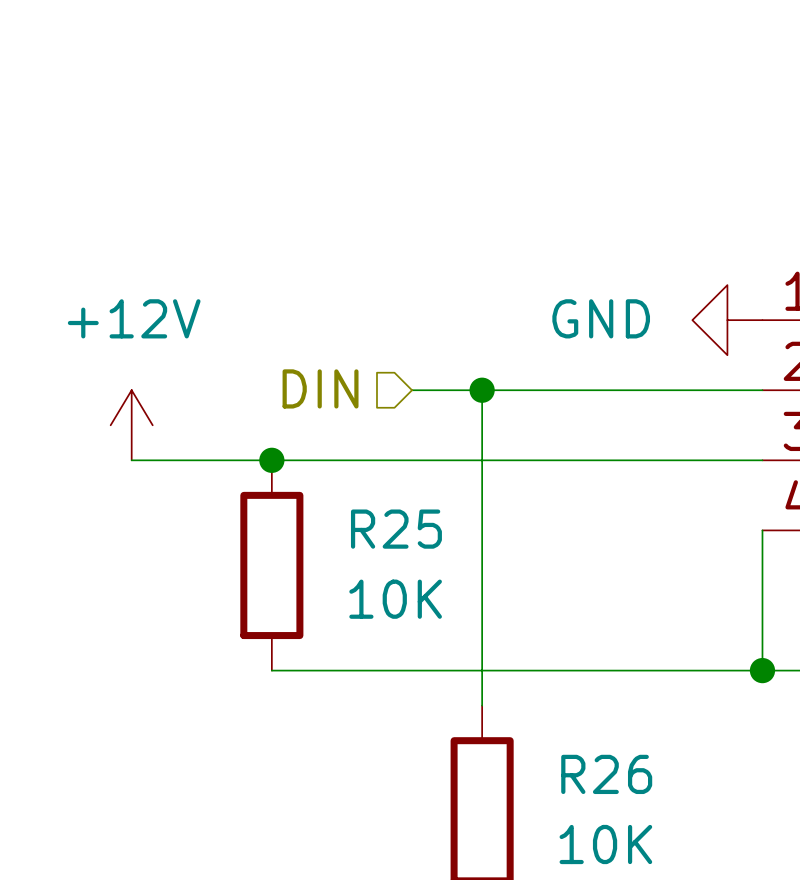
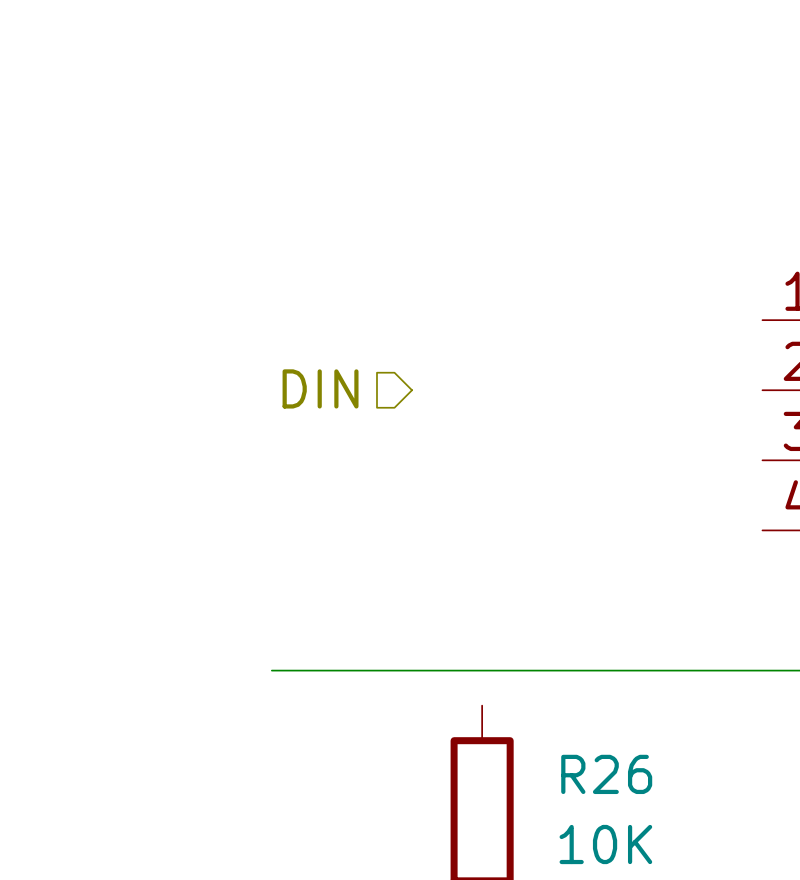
power symbol: GND (727, 320) -> none
wire: (412, 390) (762, 390) -> none
wire: (482, 390) (482, 705) -> none
junction: (482, 390) -> none
power symbol: +12V (131, 425) -> none
wire: (131, 460) (762, 460) -> none
junction: (271, 460) -> none
wire: (762, 530) (762, 670) -> none
R25: 10K (271, 565) -> none
junction: (762, 670) -> none

